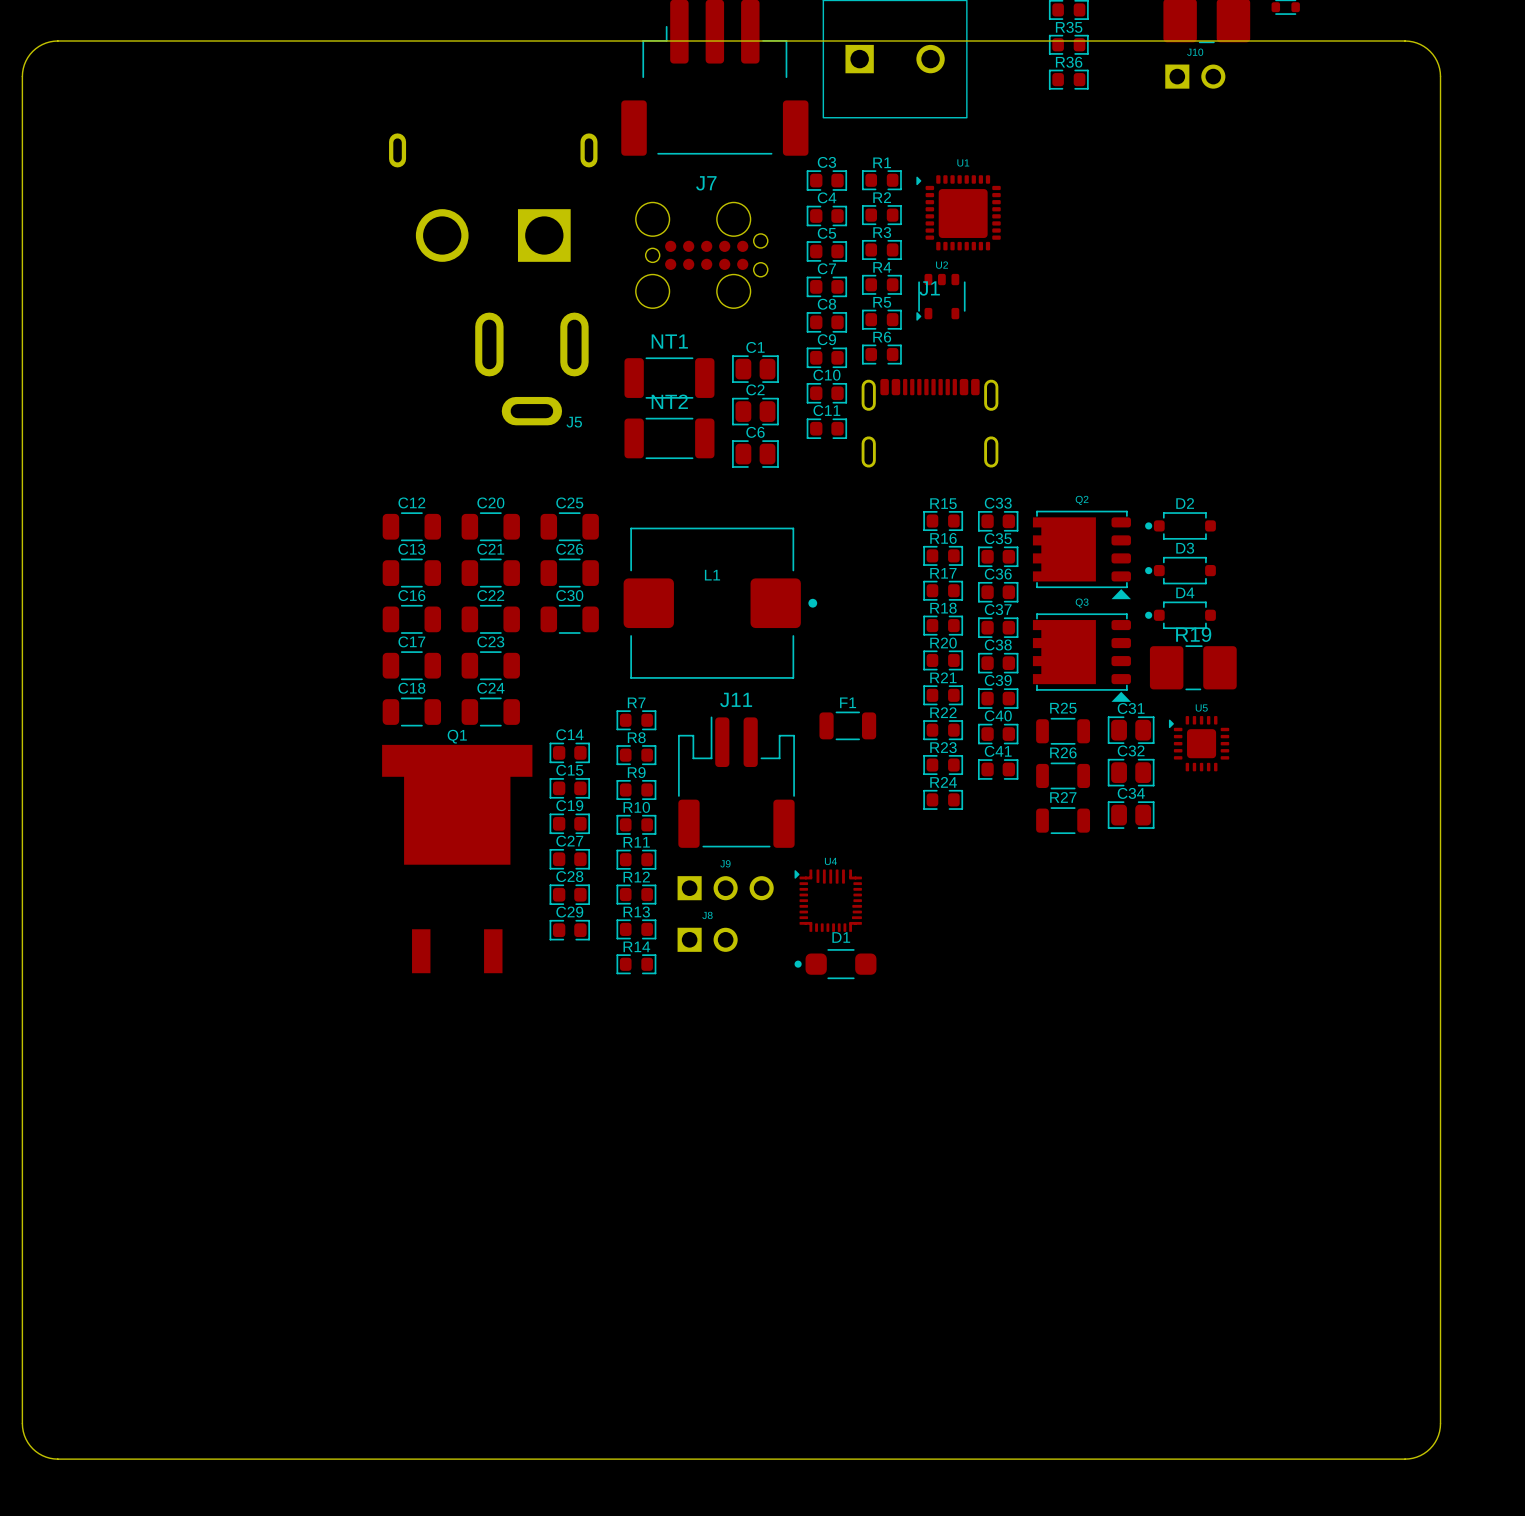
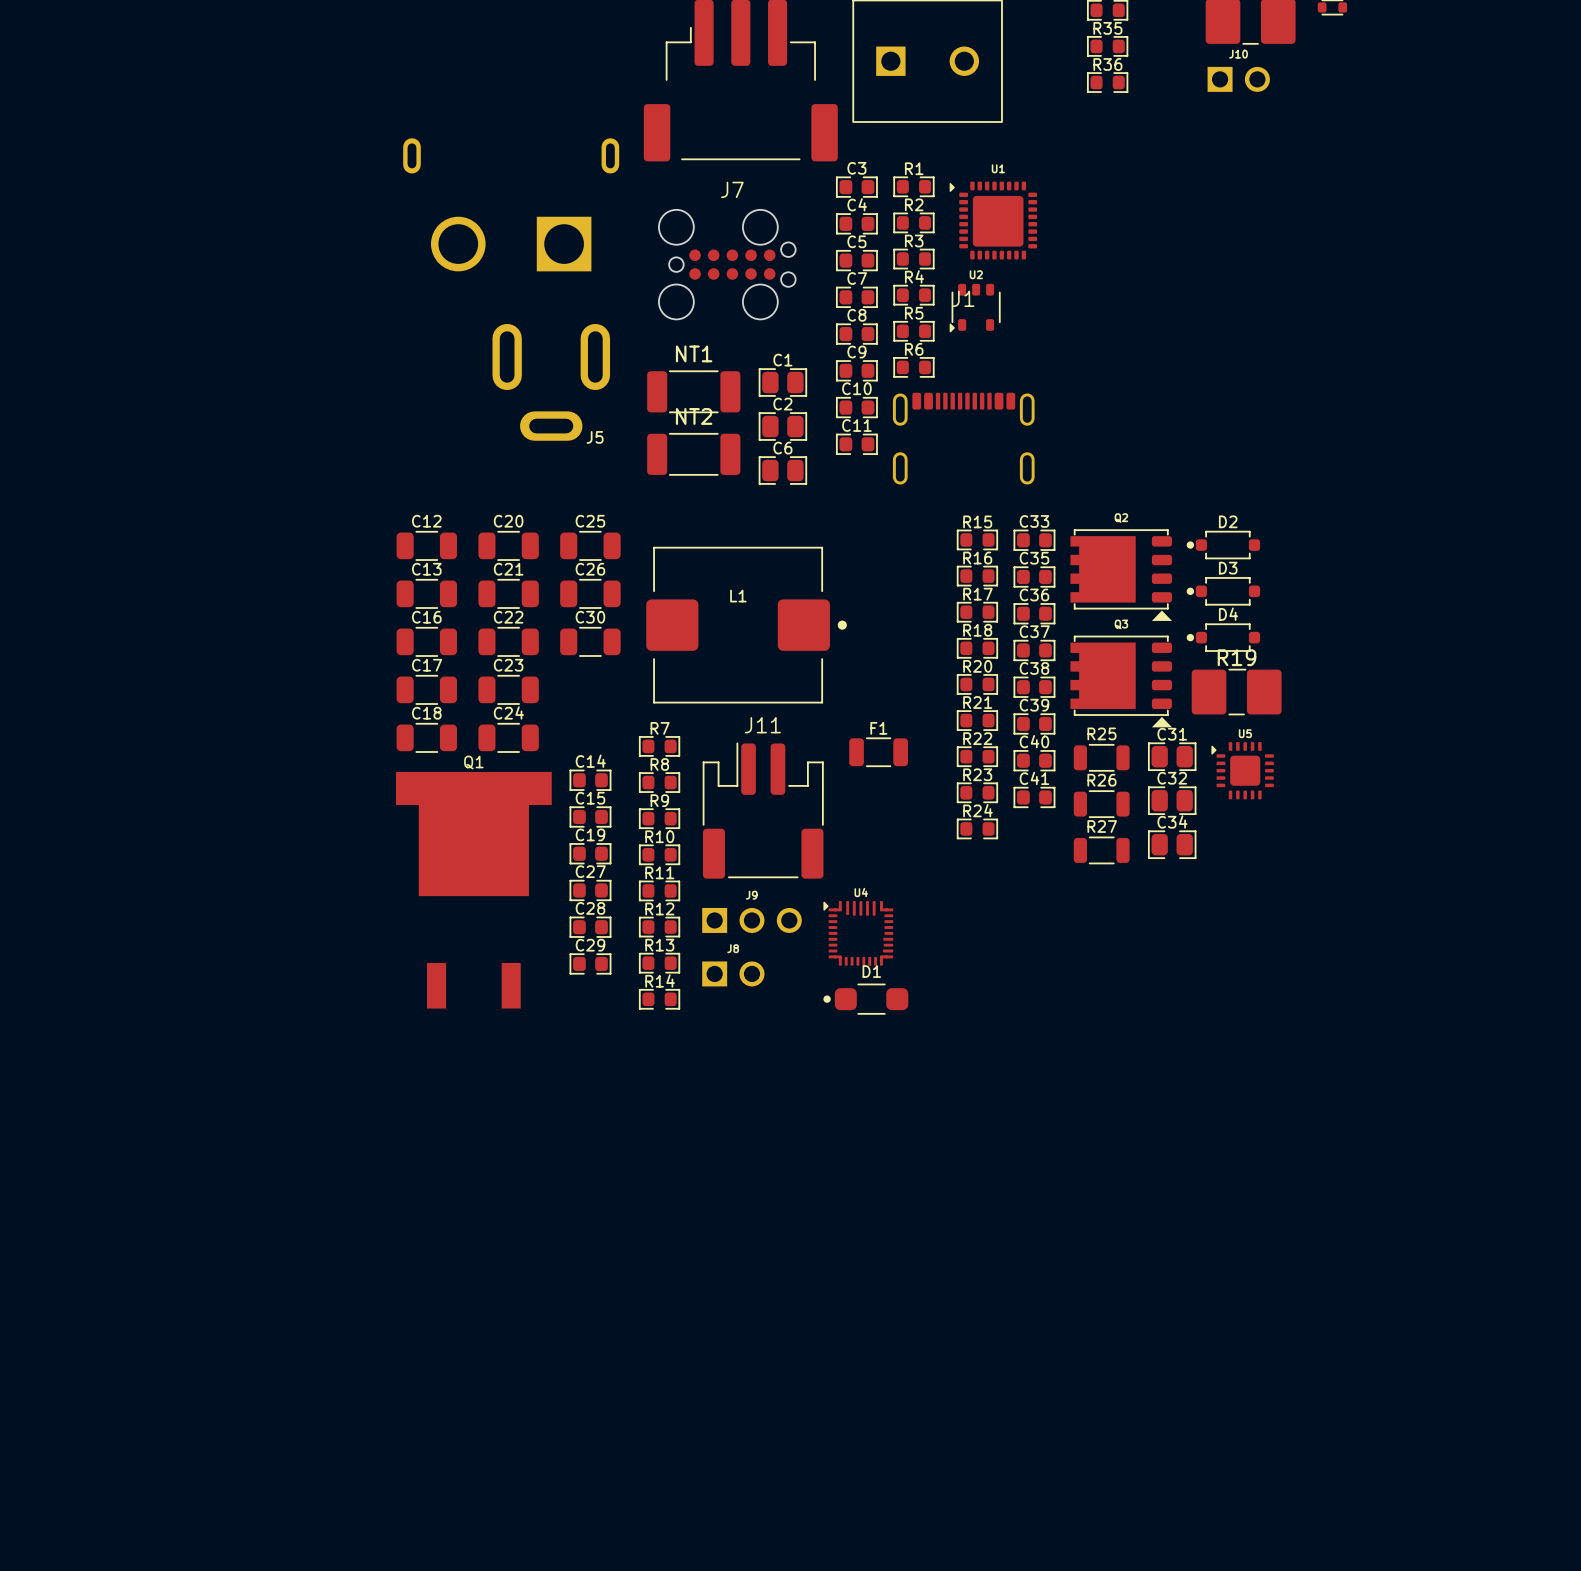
board edge: (57, 41) (1405, 41) (1420, 44) (1430, 51) (1437, 61) (1440, 76) (1440, 1423) (1438, 1435) (1430, 1448) (1416, 1457) (1405, 1459) (57, 1459) (42, 1455) (32, 1448) (24, 1435) (22, 1423) (22, 76) (25, 61) (32, 51) (46, 42) (57, 41) -> none

